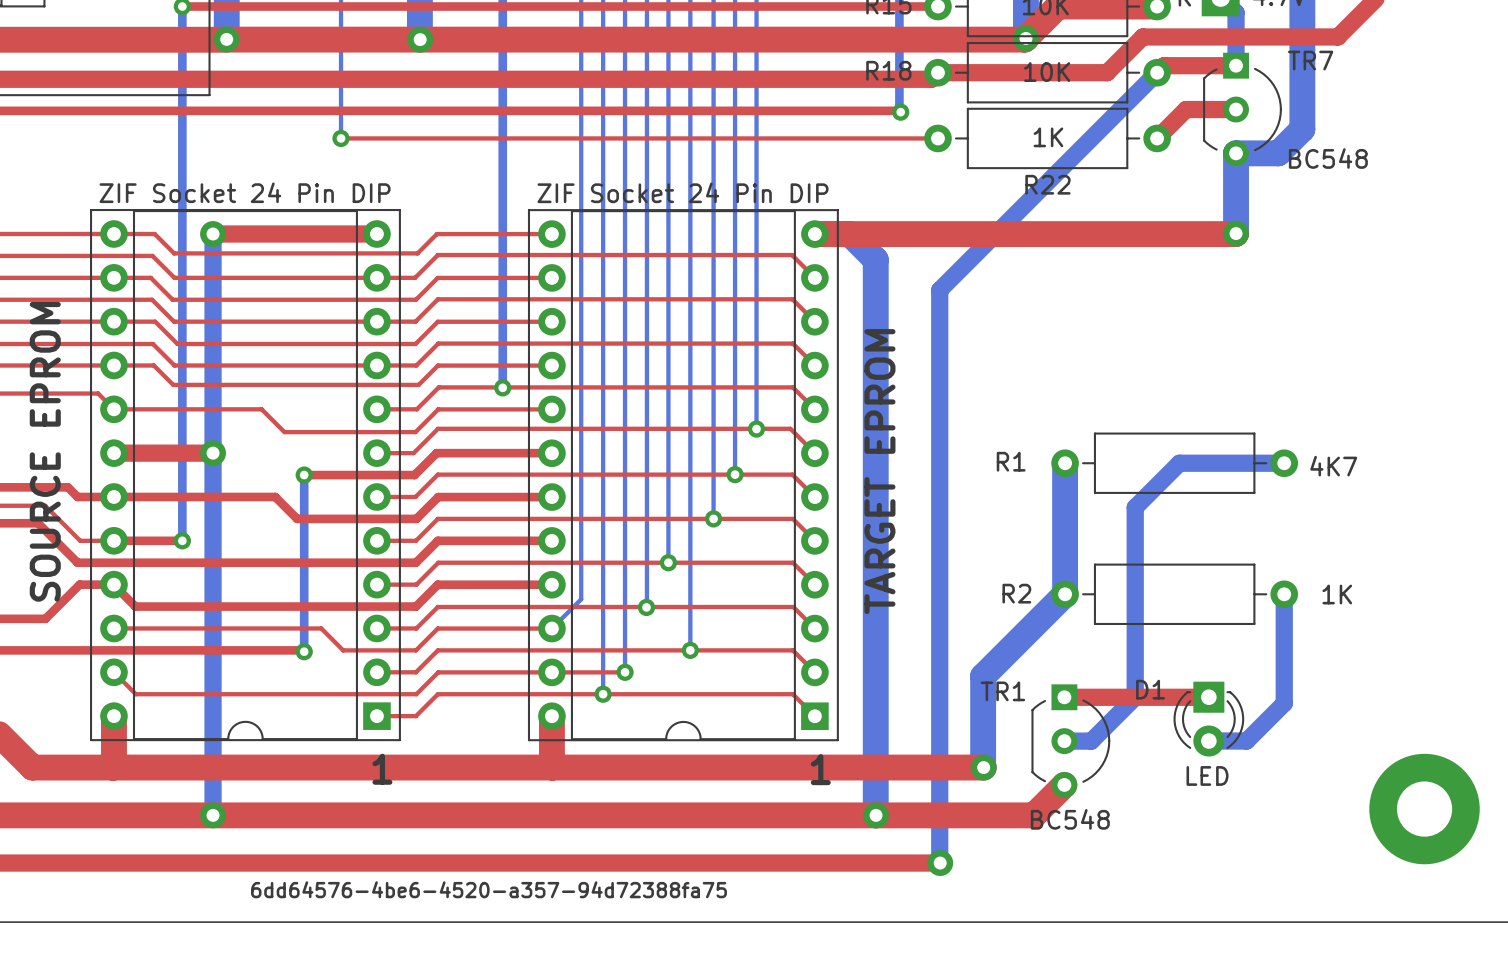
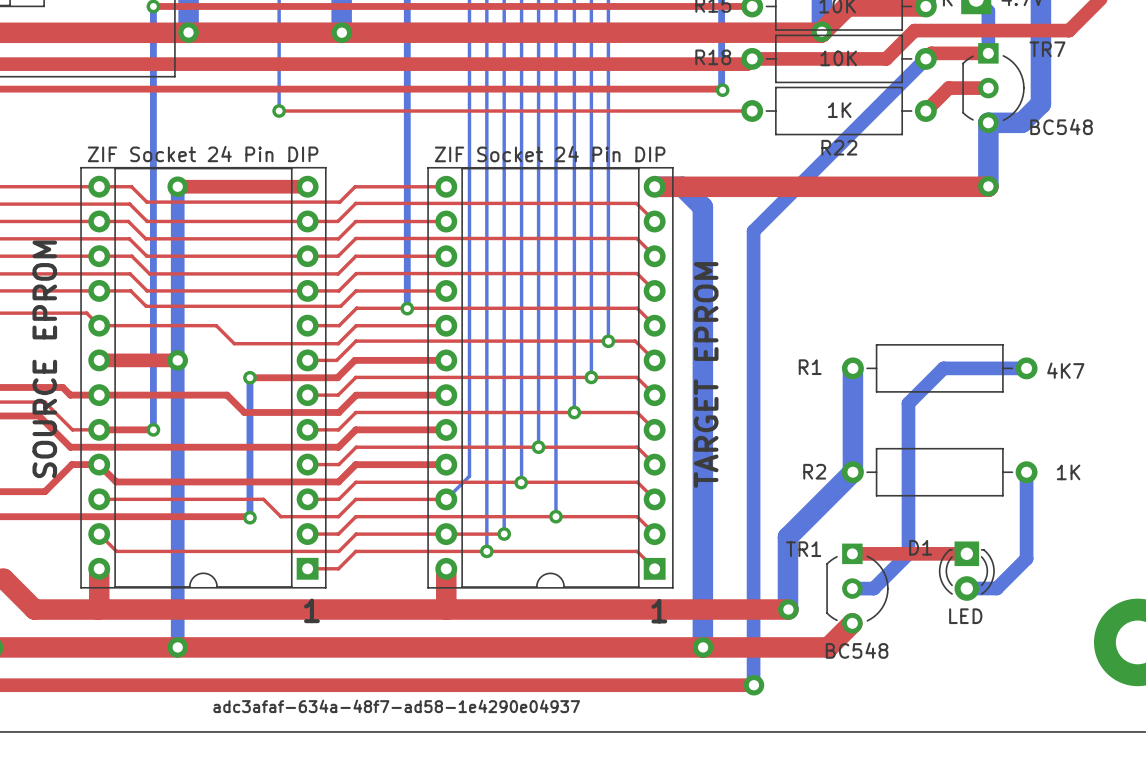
text: 6dd64576-4be6-4520-a357-94d72388fa75 (489, 889) -> adc3afaf-634a-48f7-ad58-1e4290e04937 (396, 706)

